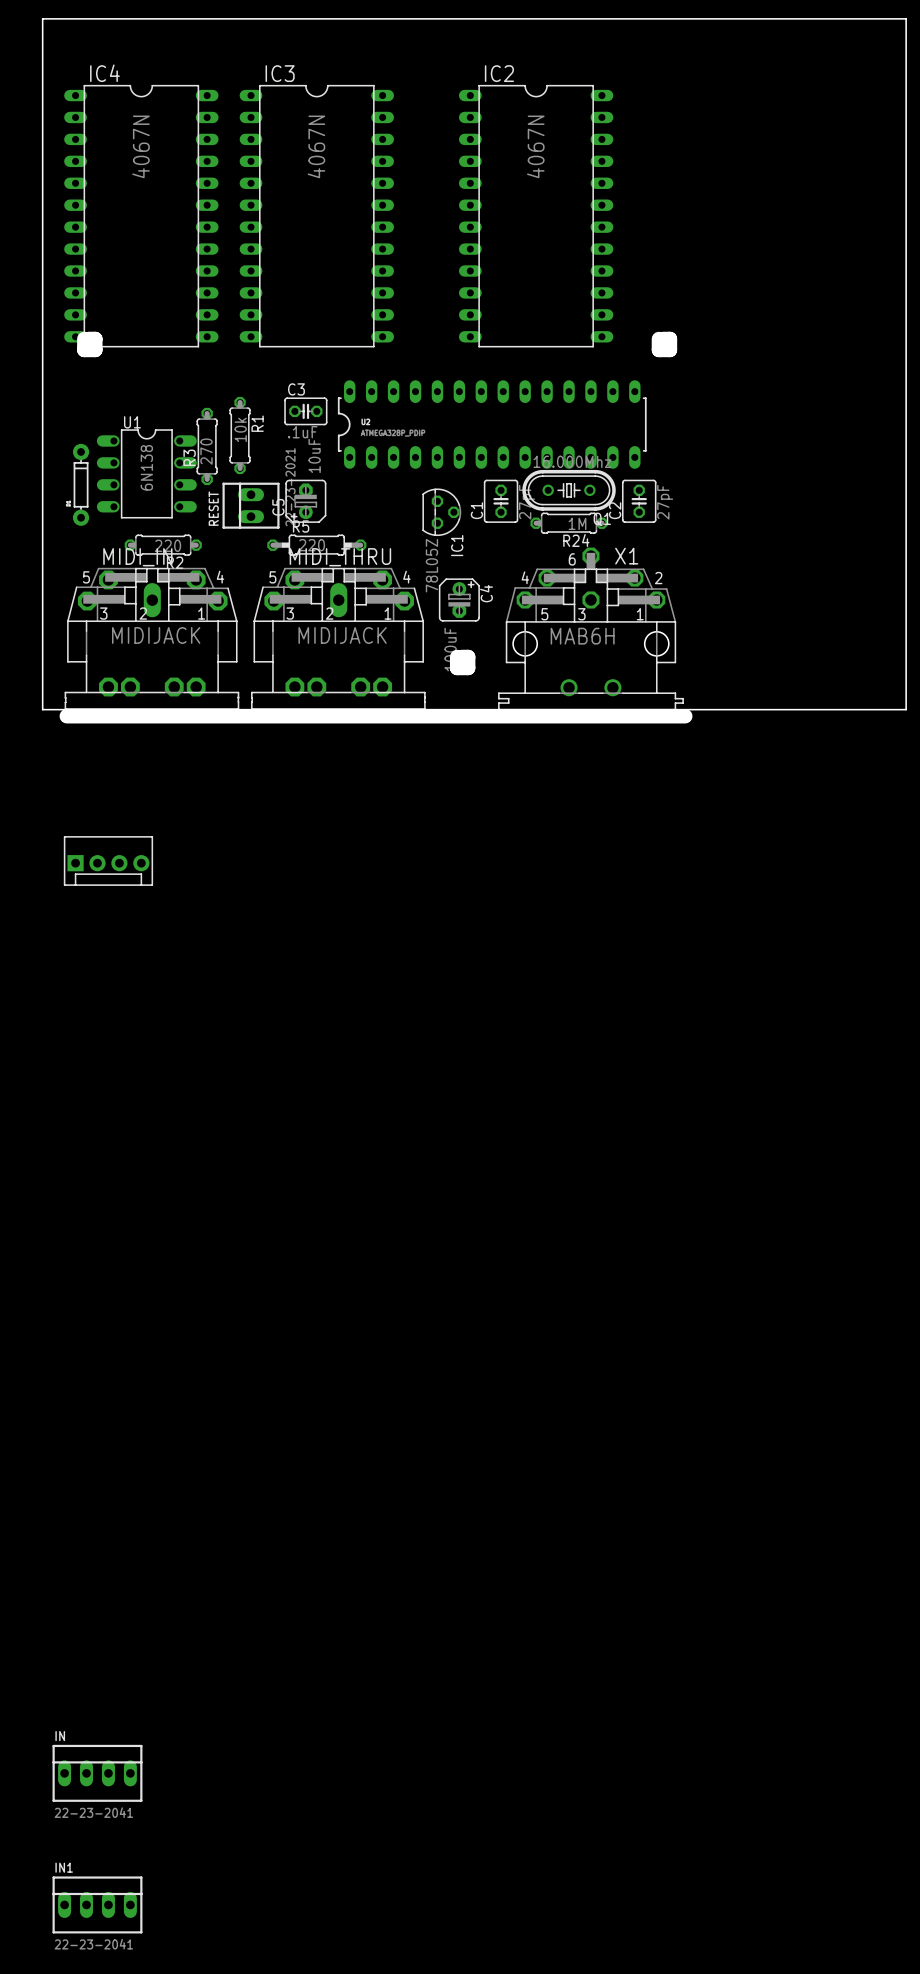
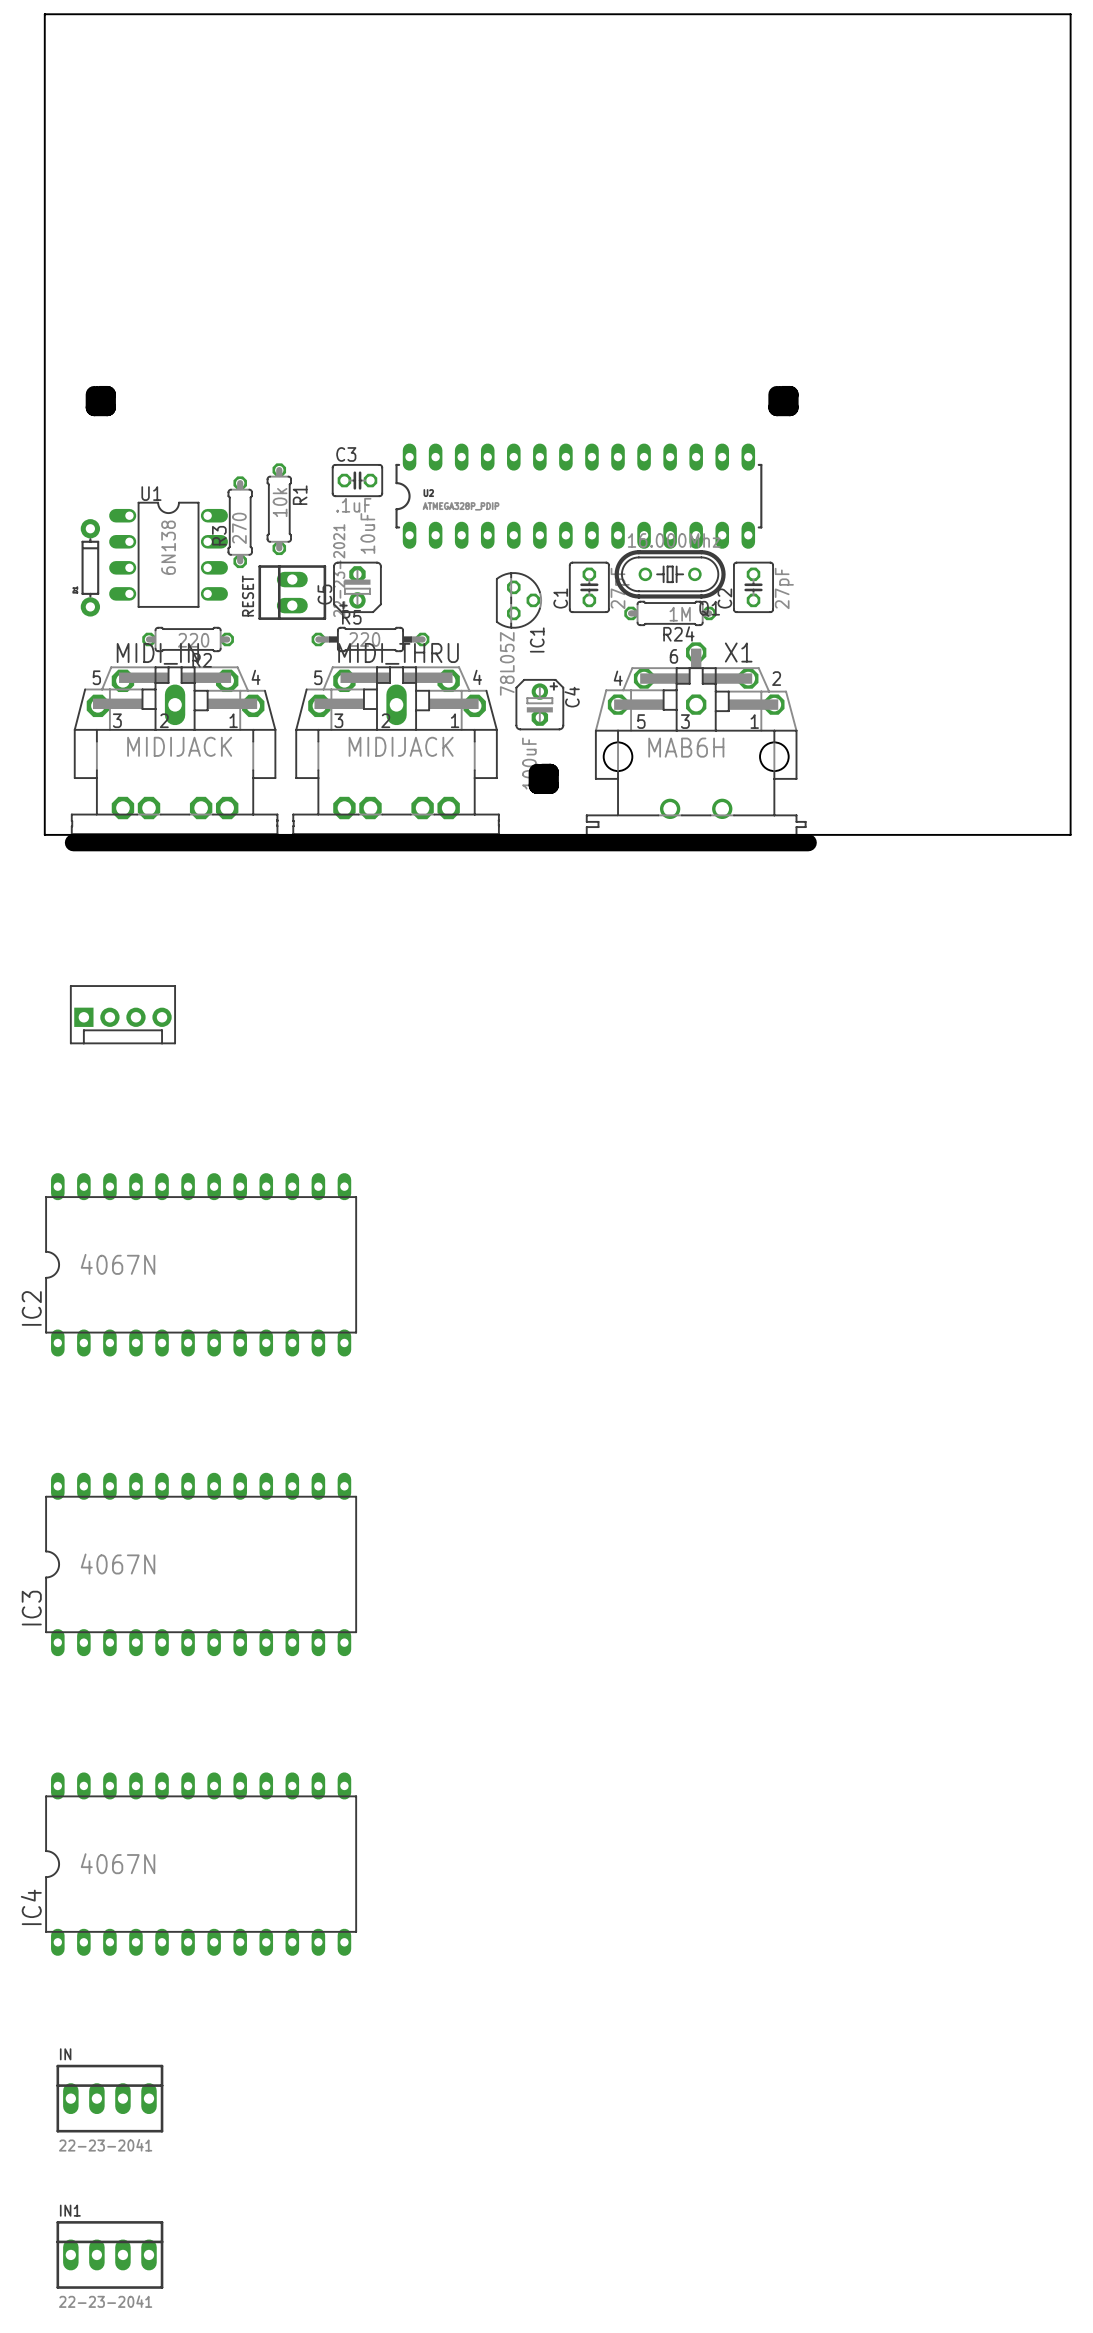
IC4 rotation: 0° (141, 216) -> 90° counterclockwise (201, 1864)
IC4 position: (141, 216) -> (201, 1864)
IC3 rotation: 0° (316, 216) -> 90° counterclockwise (201, 1564)
IC3 position: (316, 216) -> (201, 1564)
IC2 rotation: 0° (536, 216) -> 90° counterclockwise (201, 1264)
IC2 position: (536, 216) -> (201, 1264)

